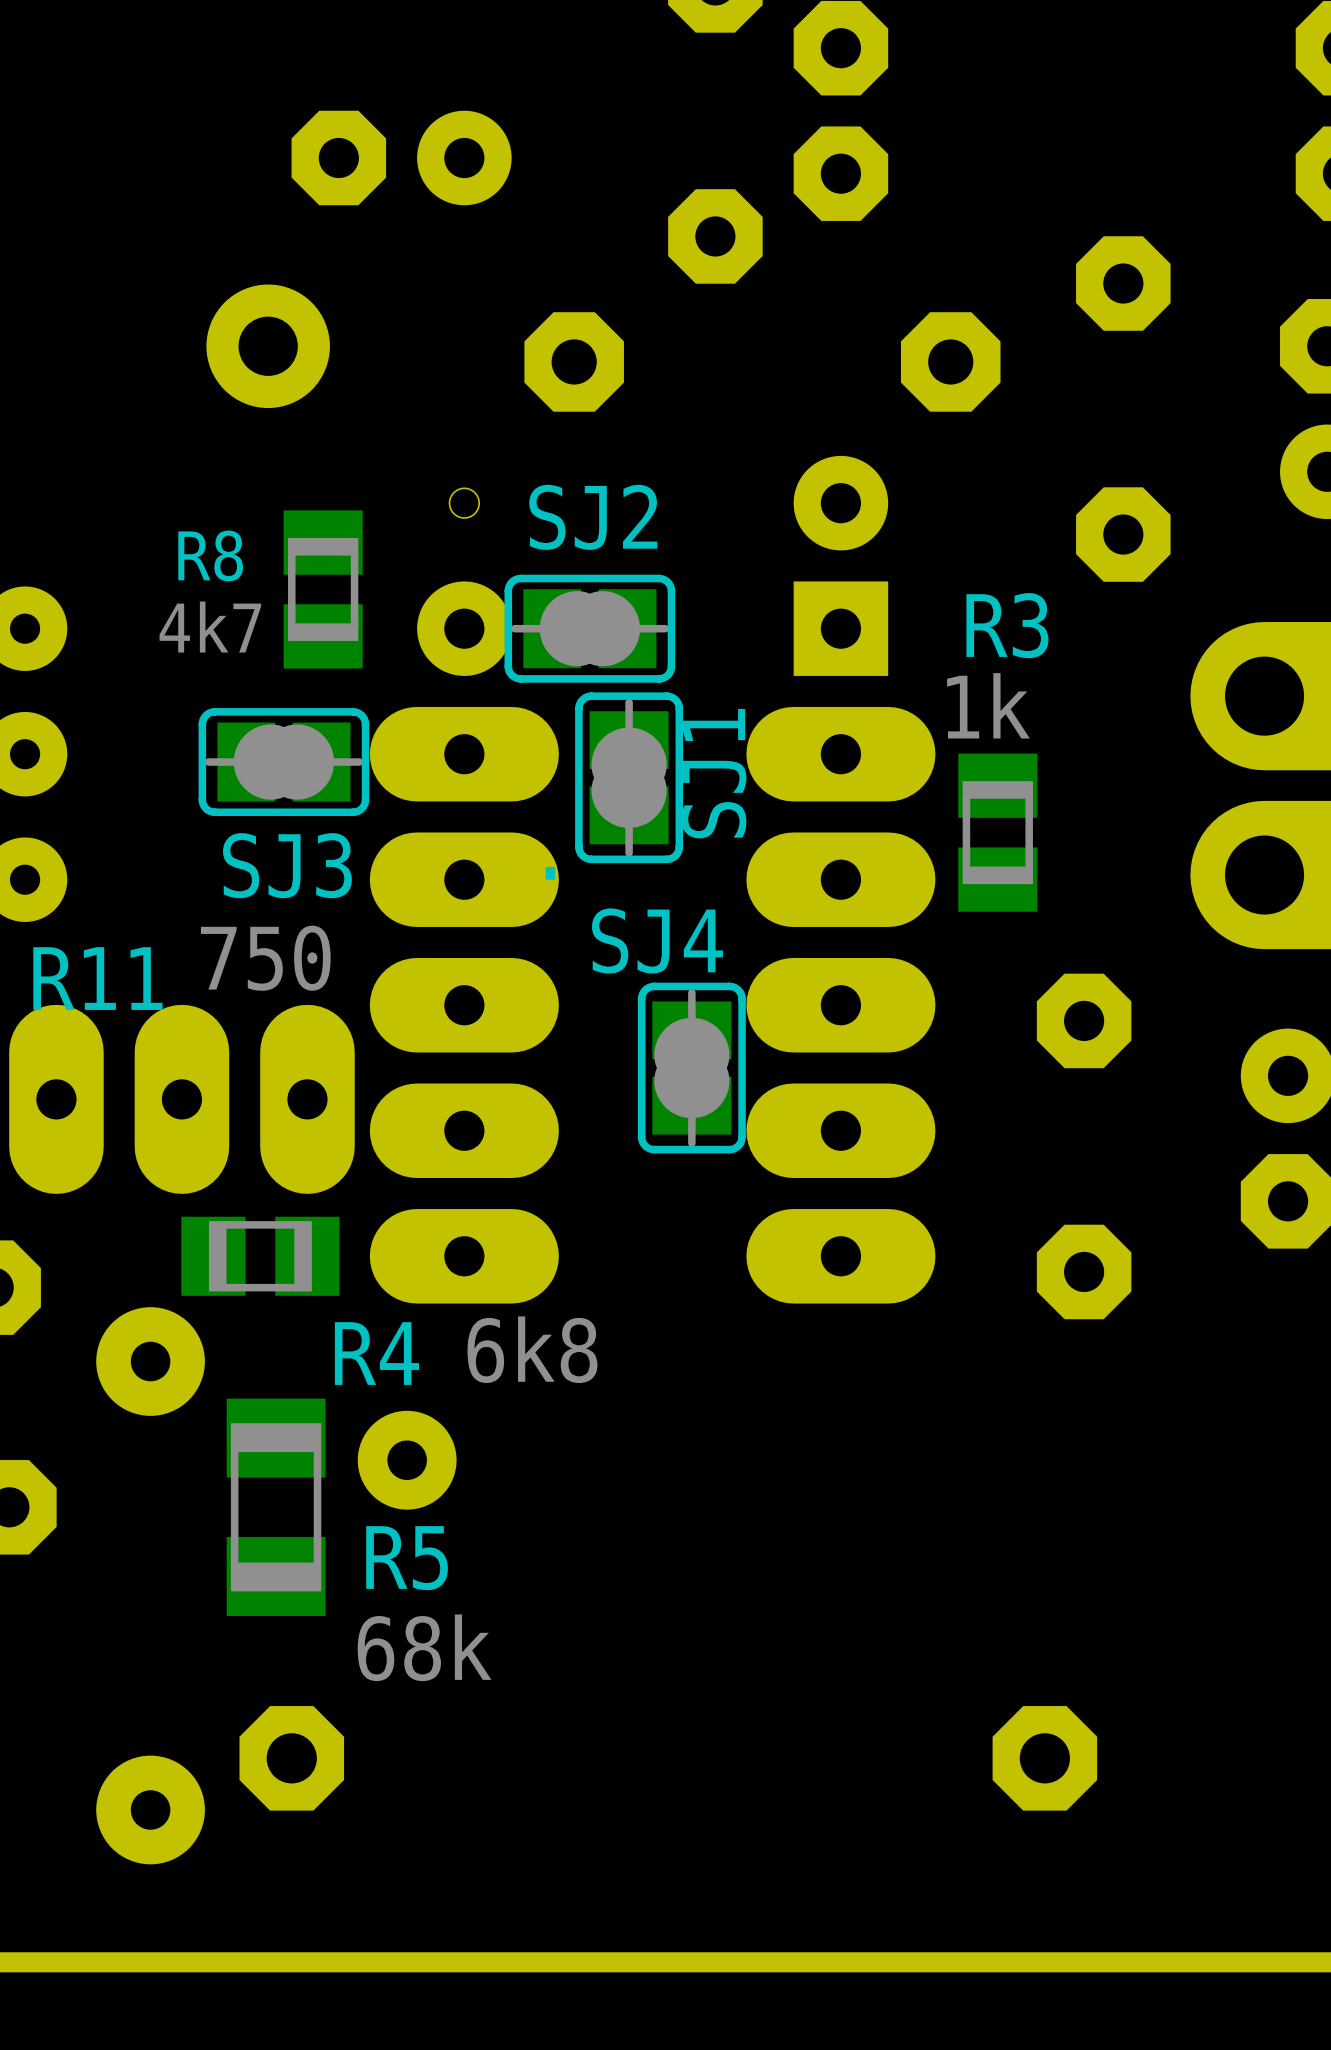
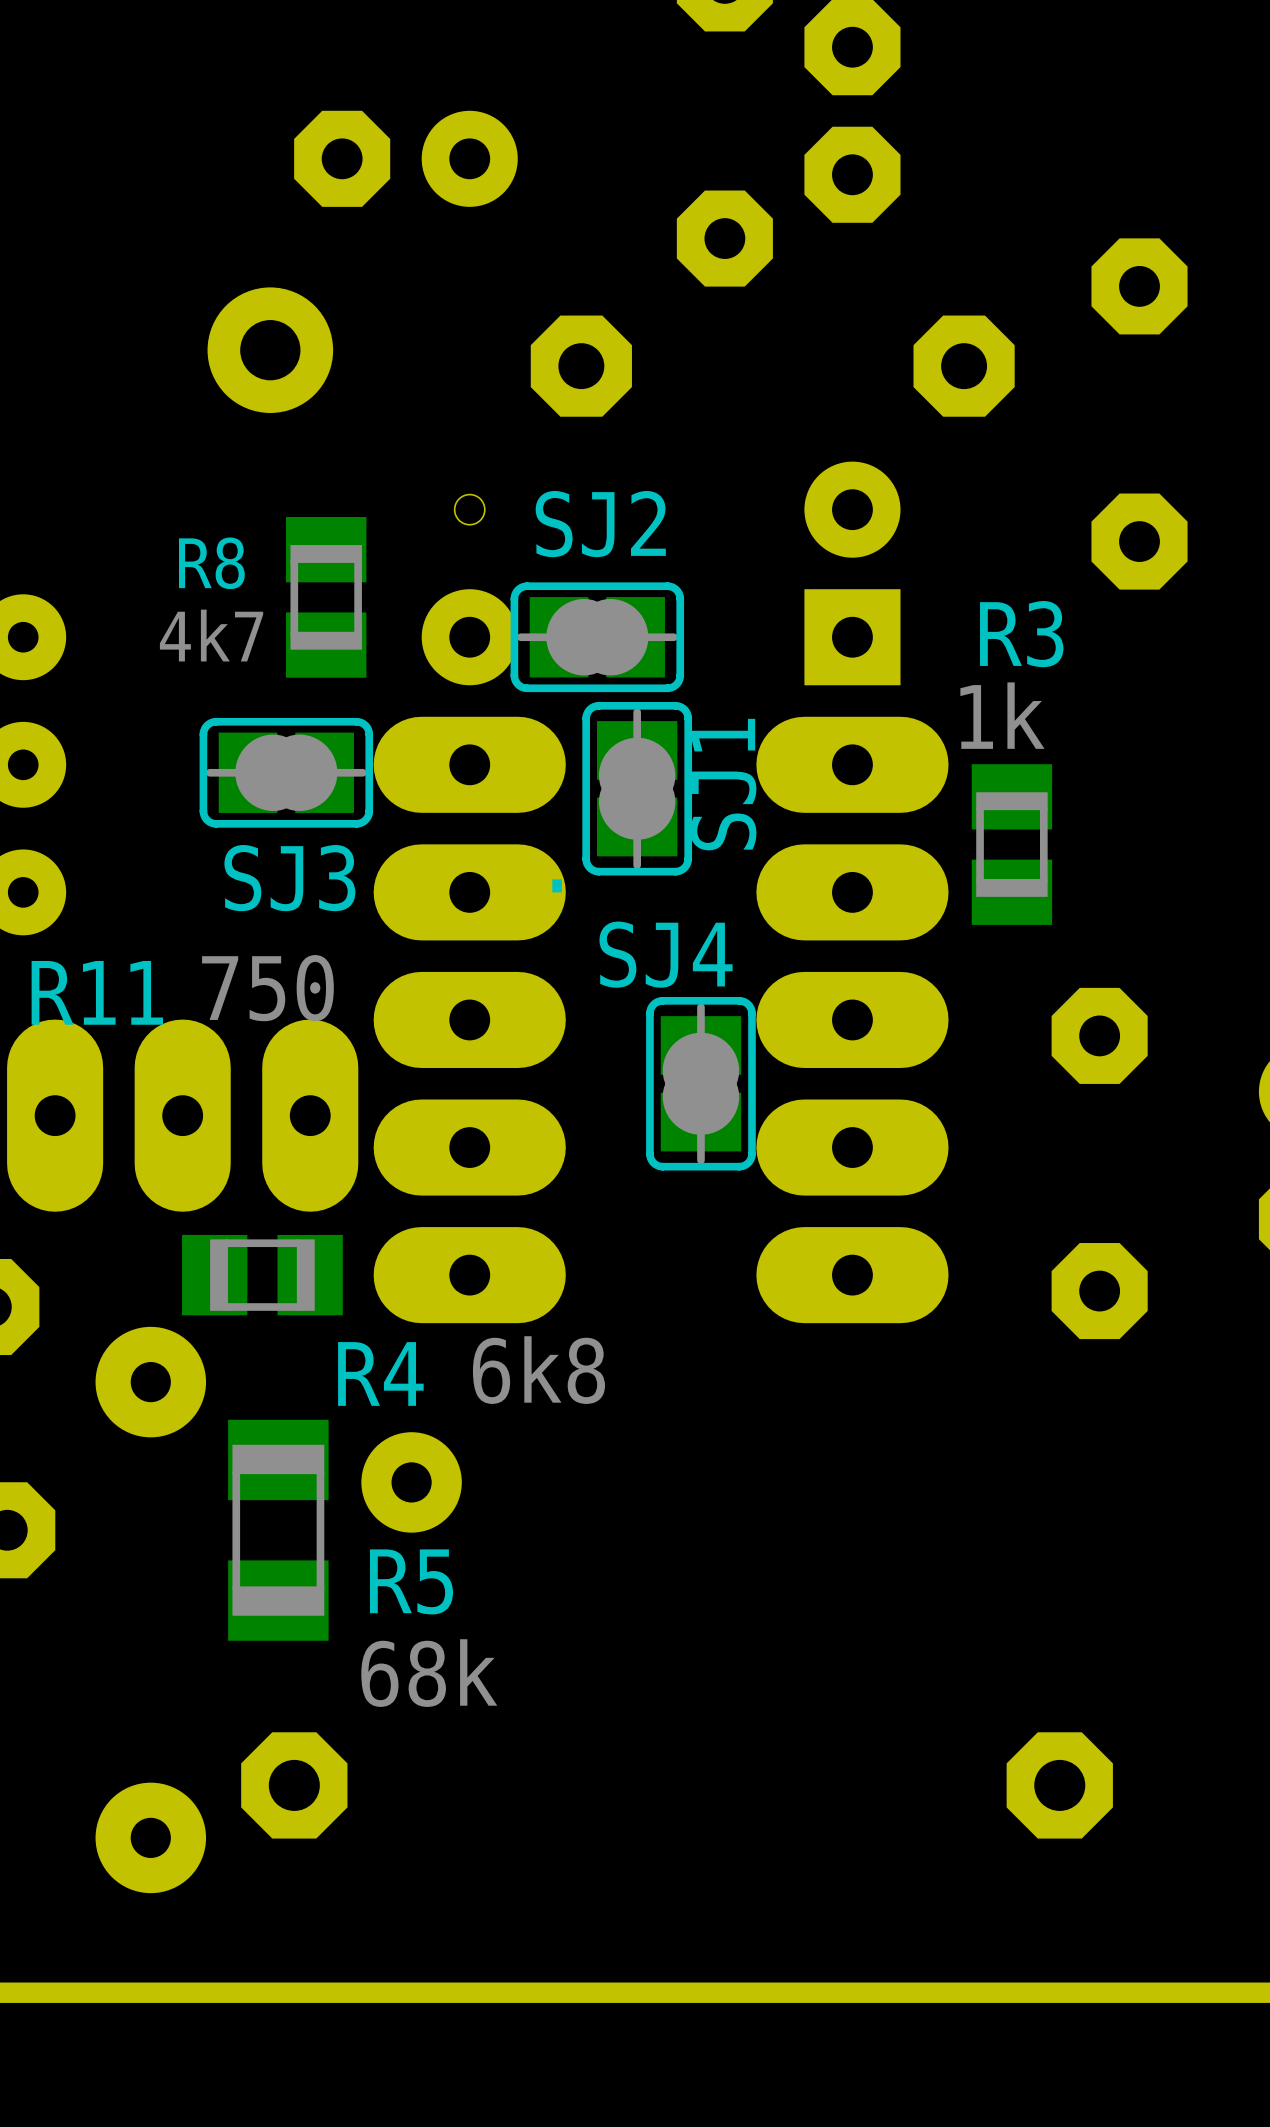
R11 value position: 750 (265, 958) -> 750 (267, 988)

